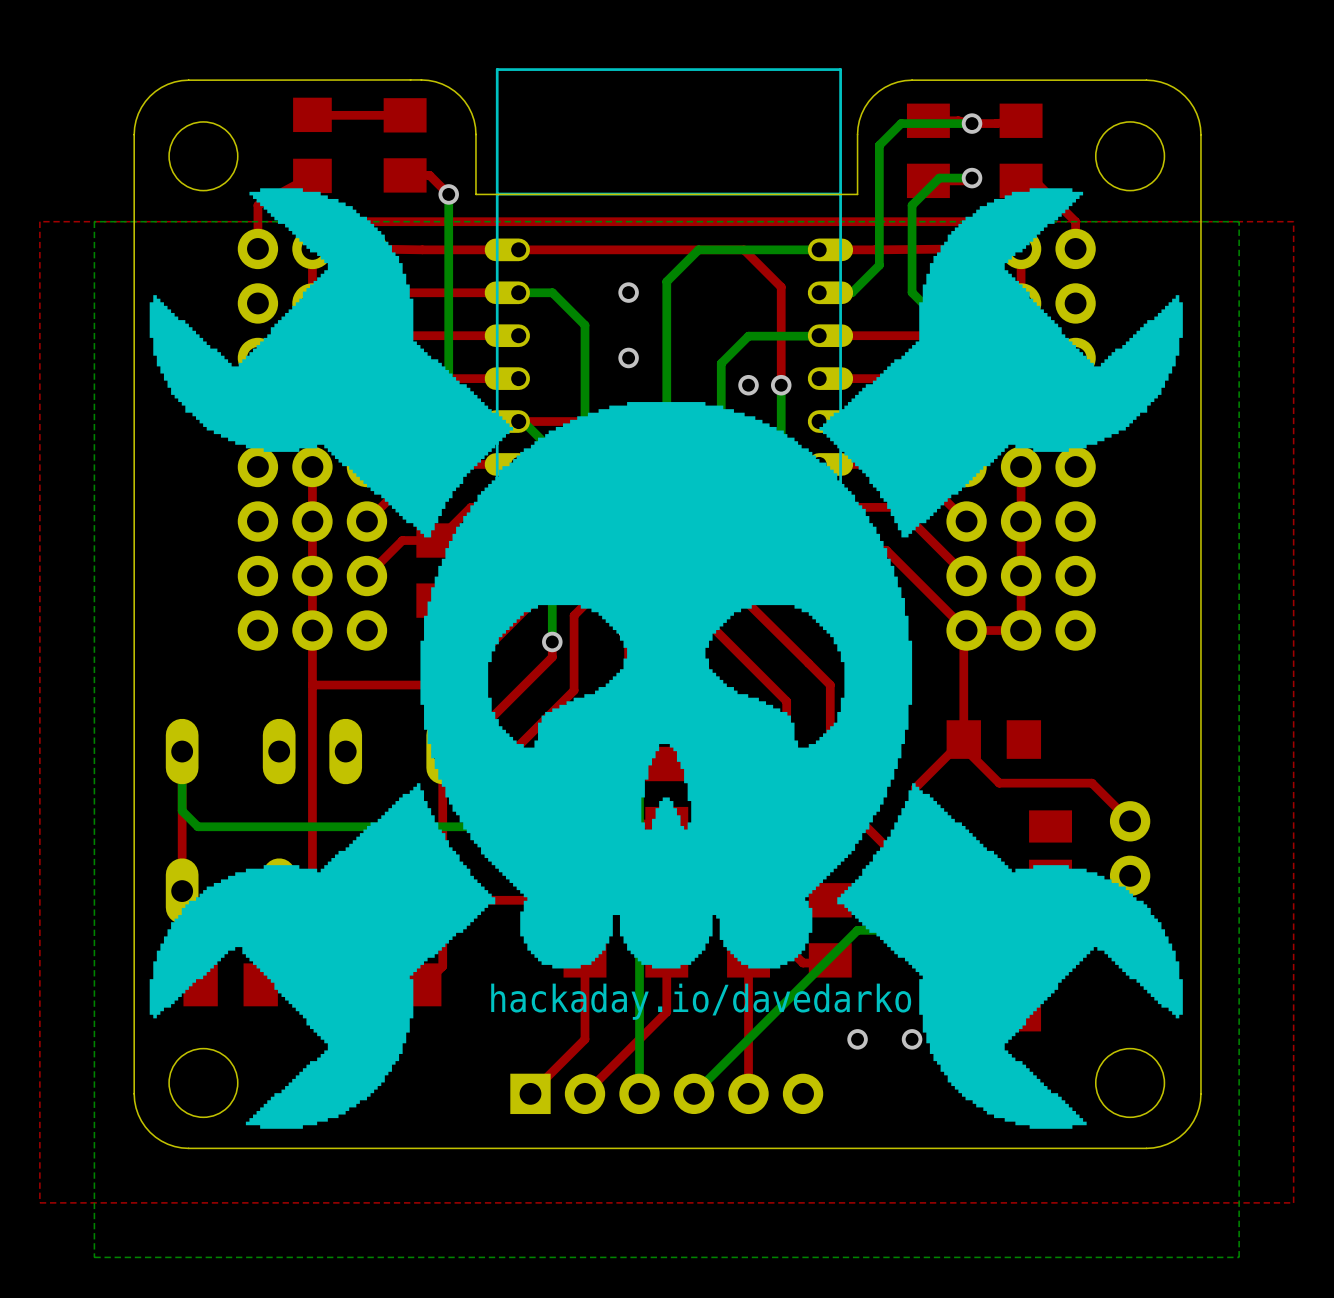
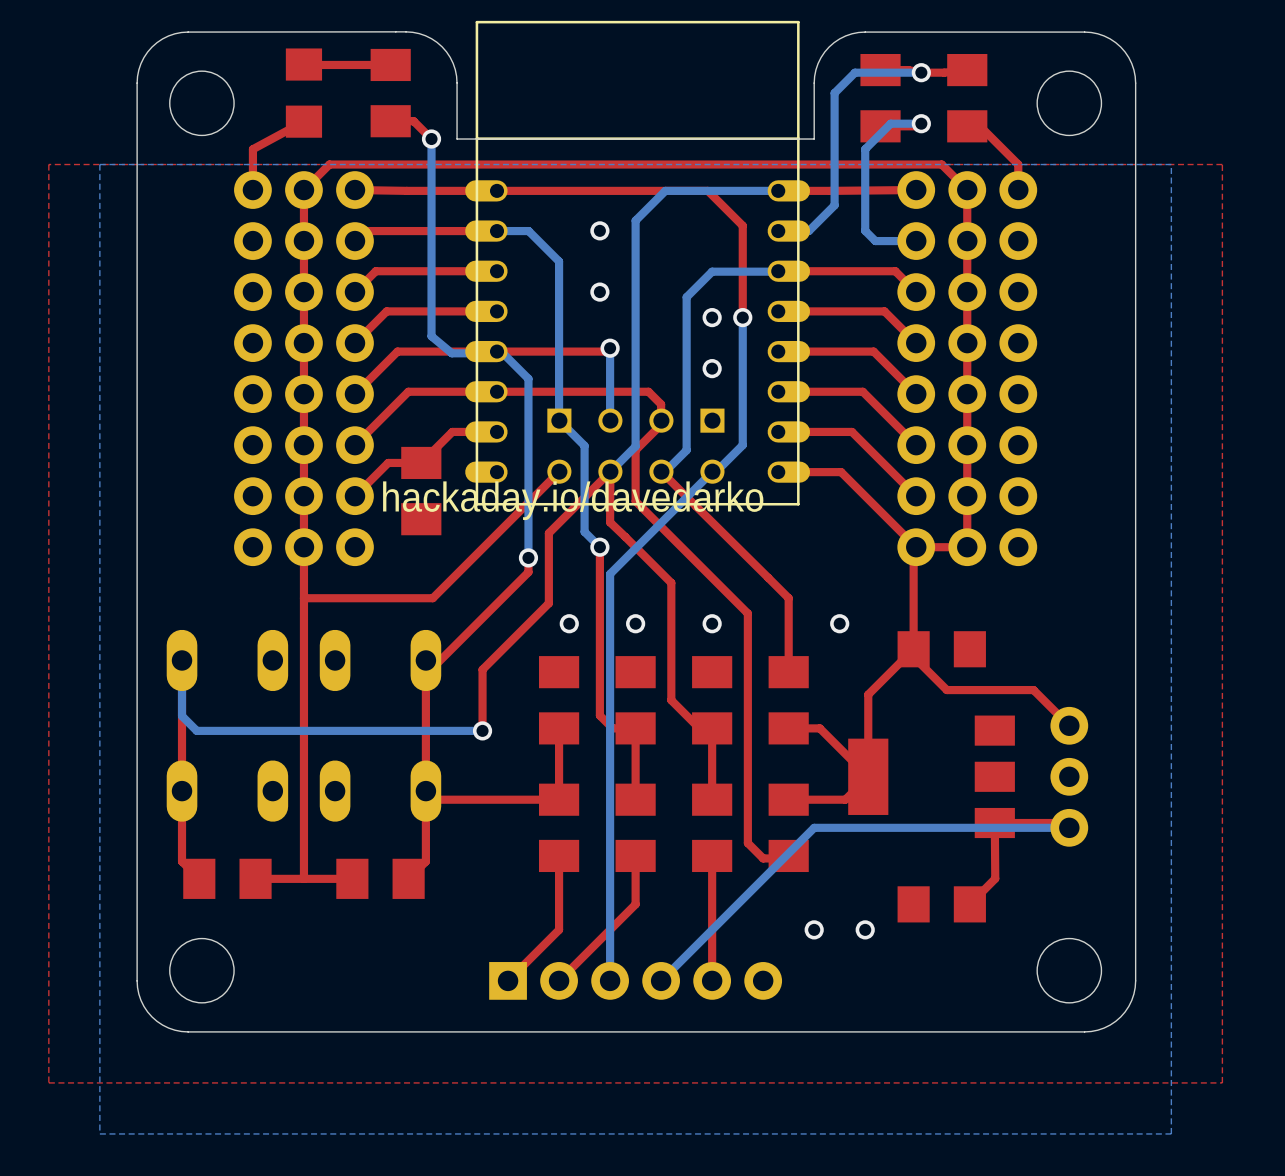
drawing: [149, 188, 1183, 1129] -> none
text: none -> hackaday.io/davedarko (573, 500)
text: hackaday.io/davedarko (701, 1001) -> none

